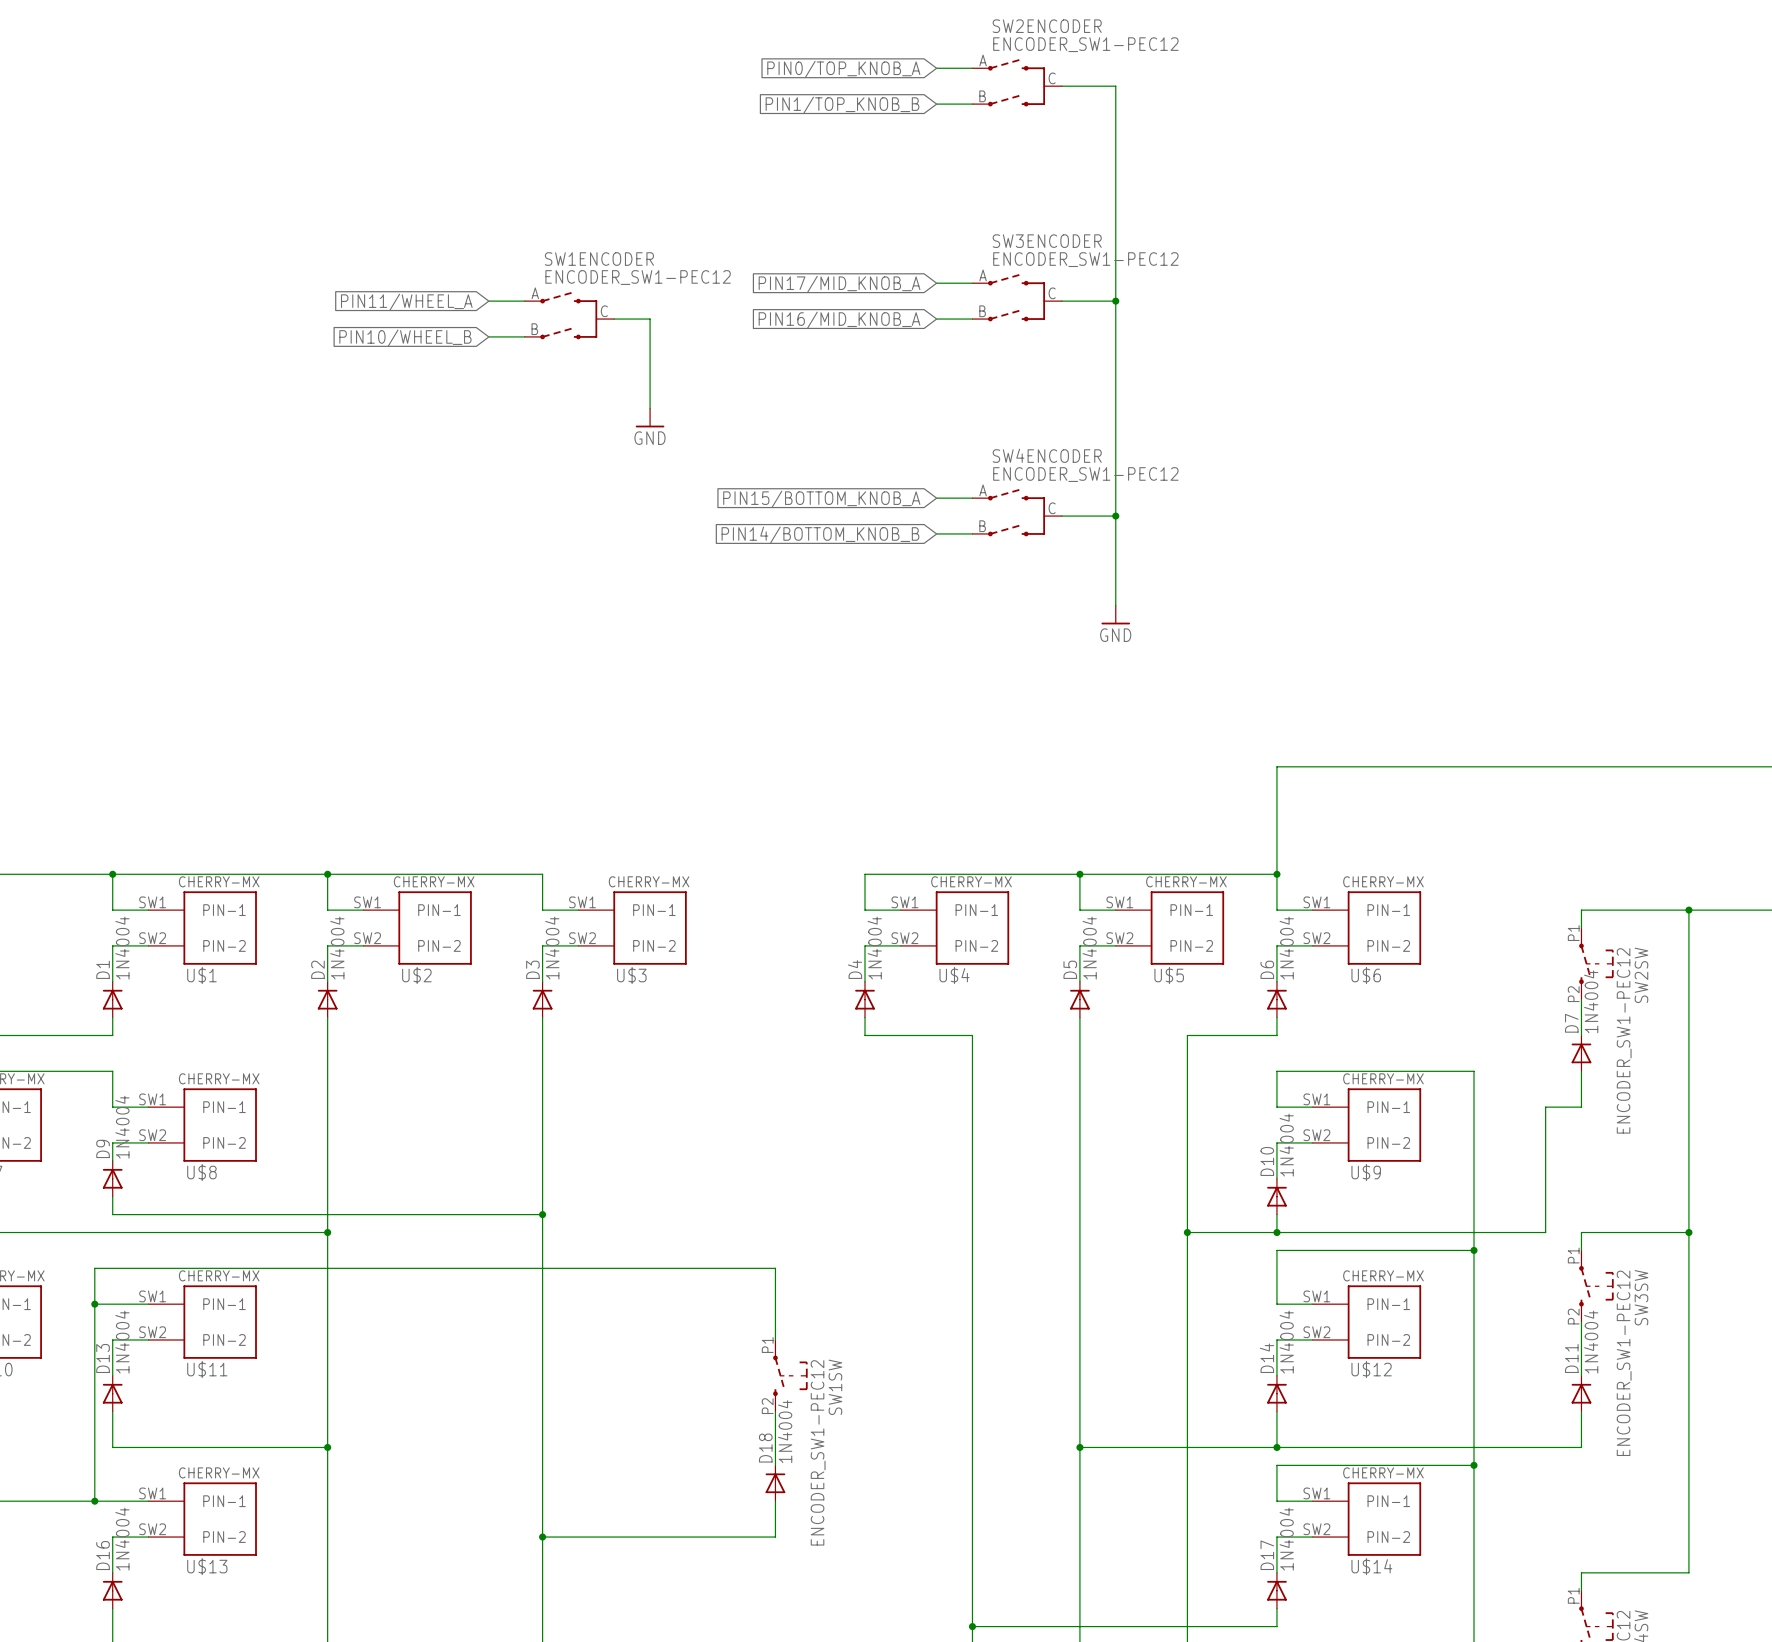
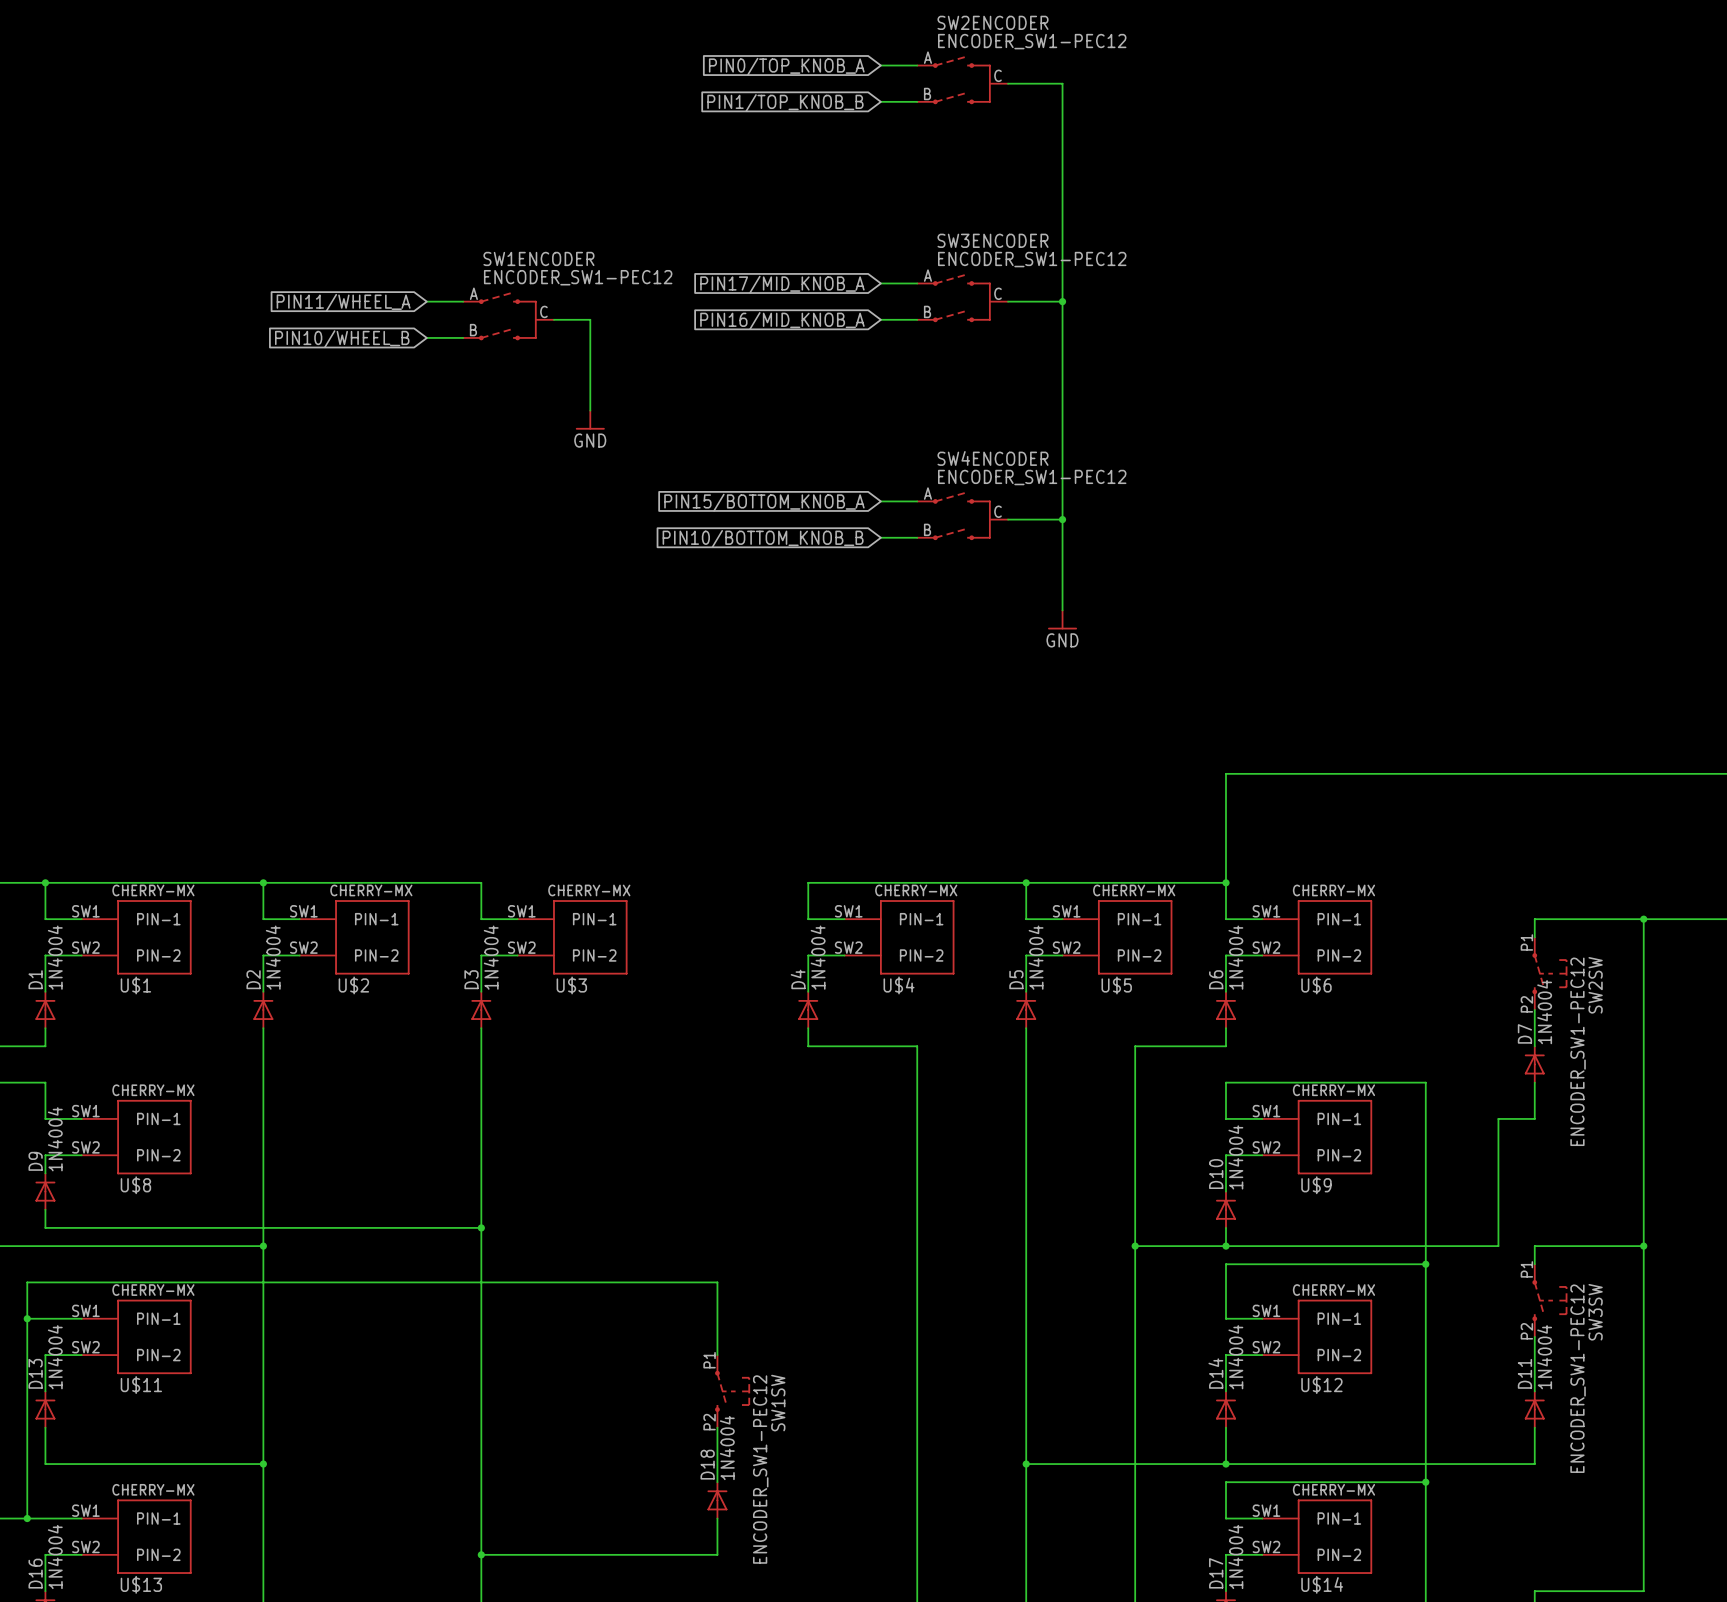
global label: PIN14/BOTTOM_KNOB_B (820, 535) -> PIN10/BOTTOM_KNOB_B (763, 538)

